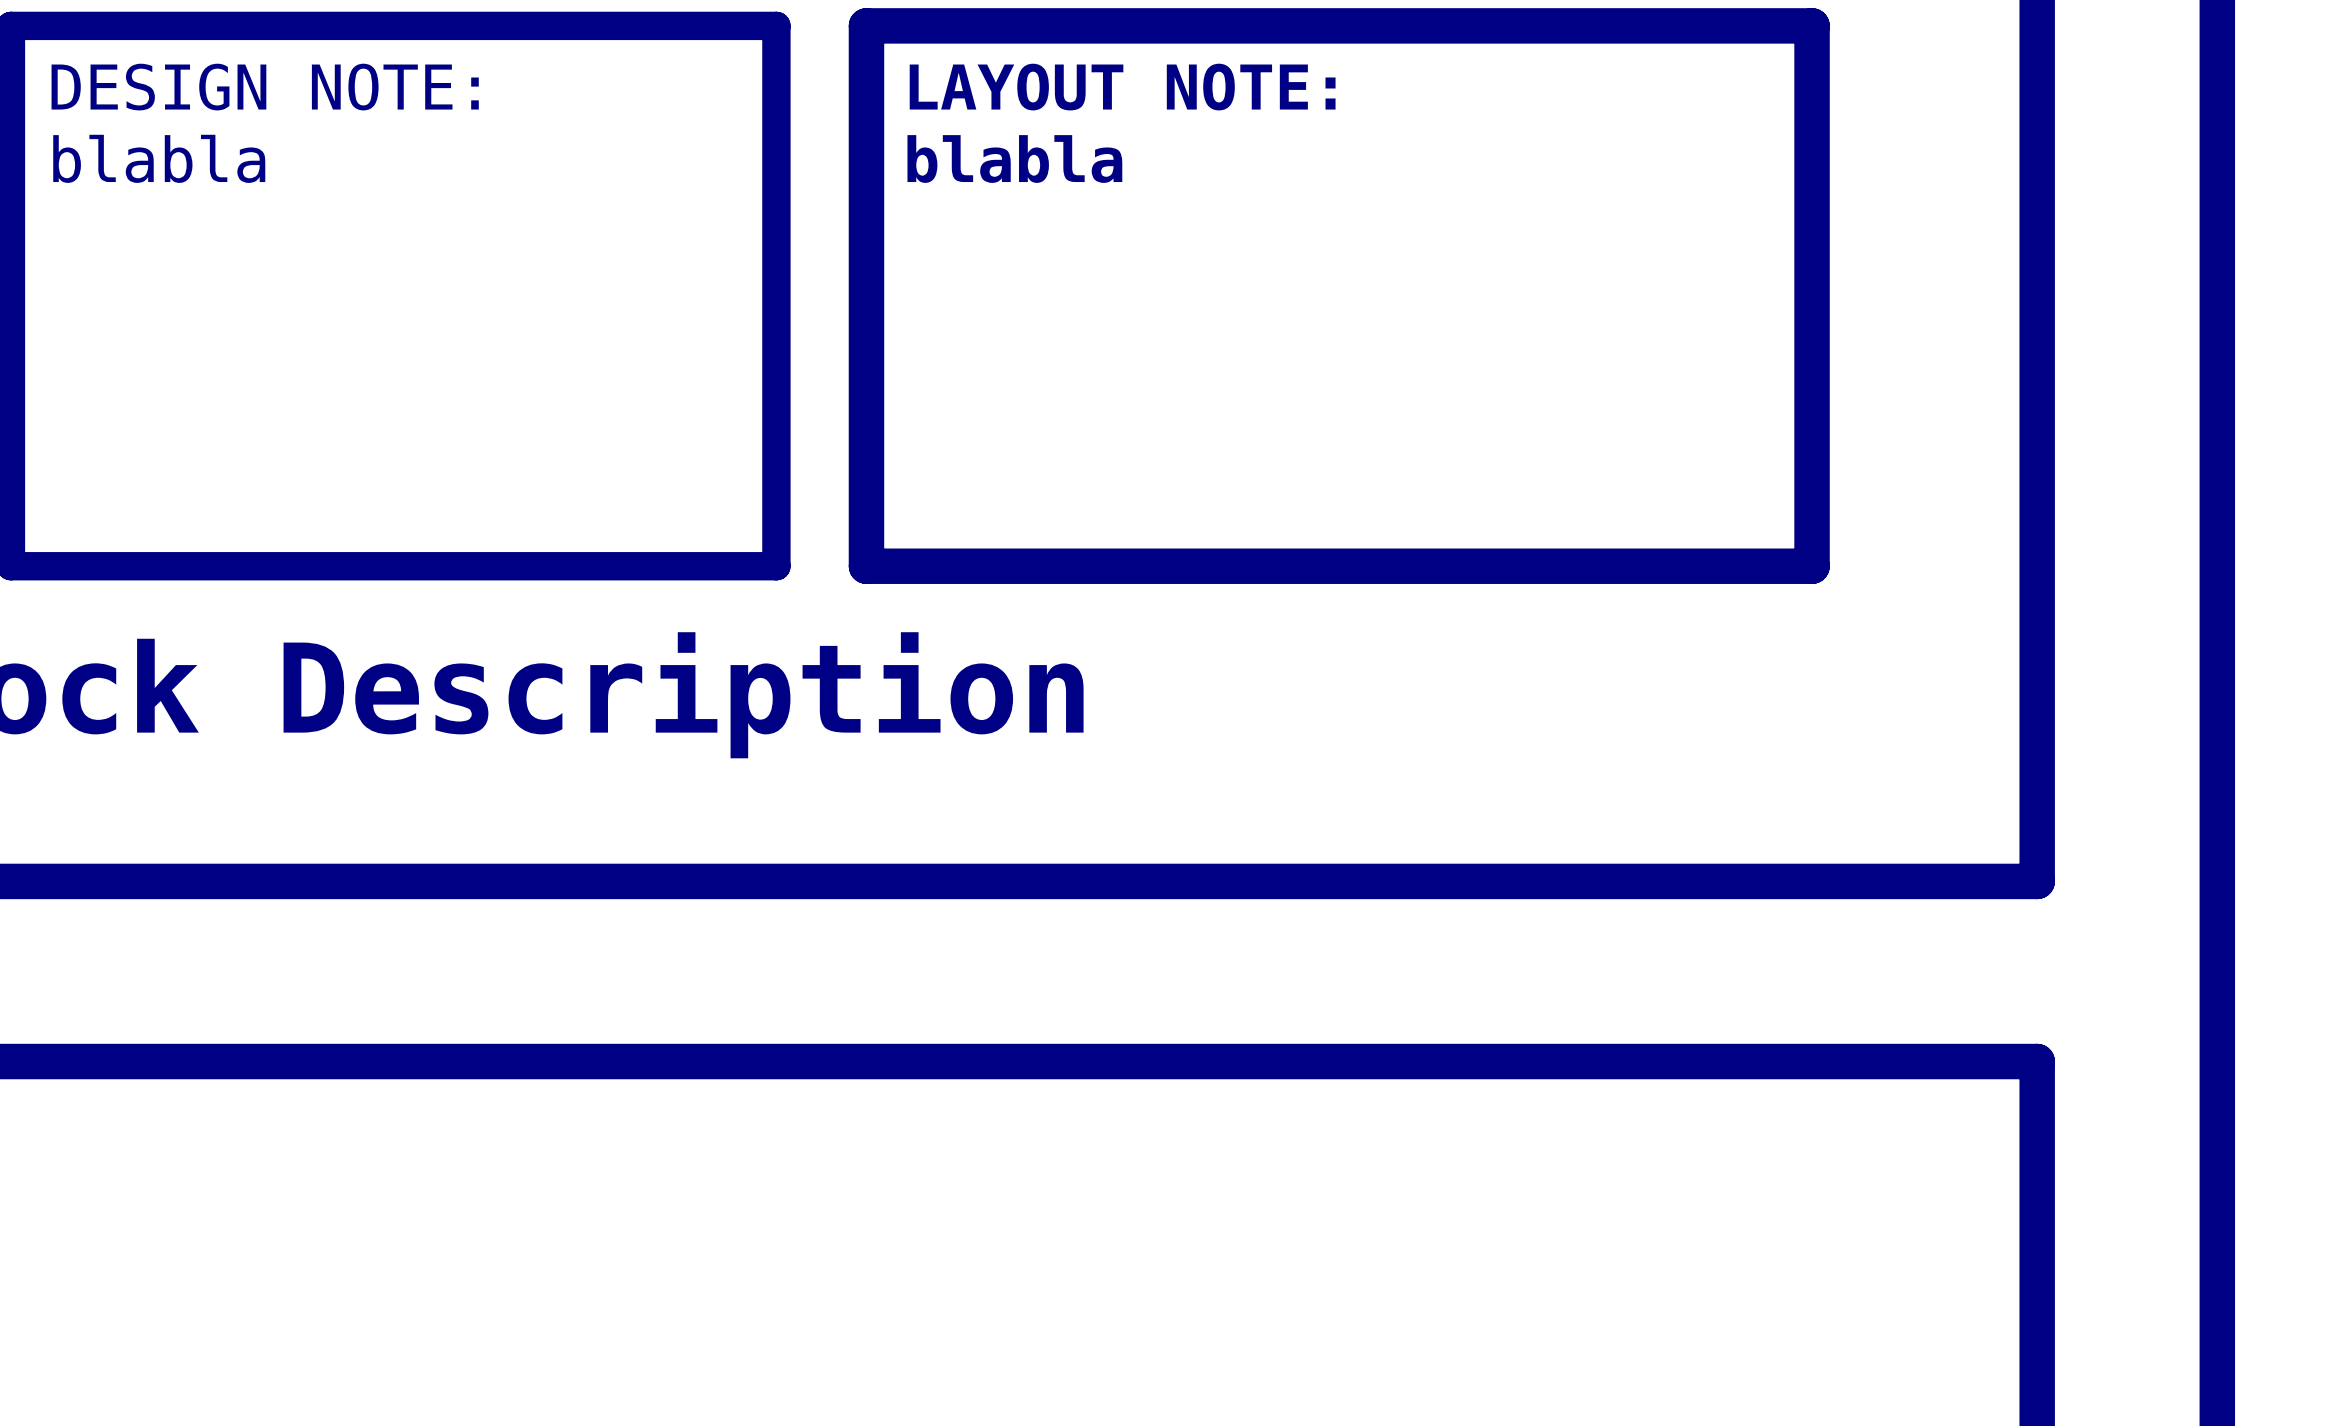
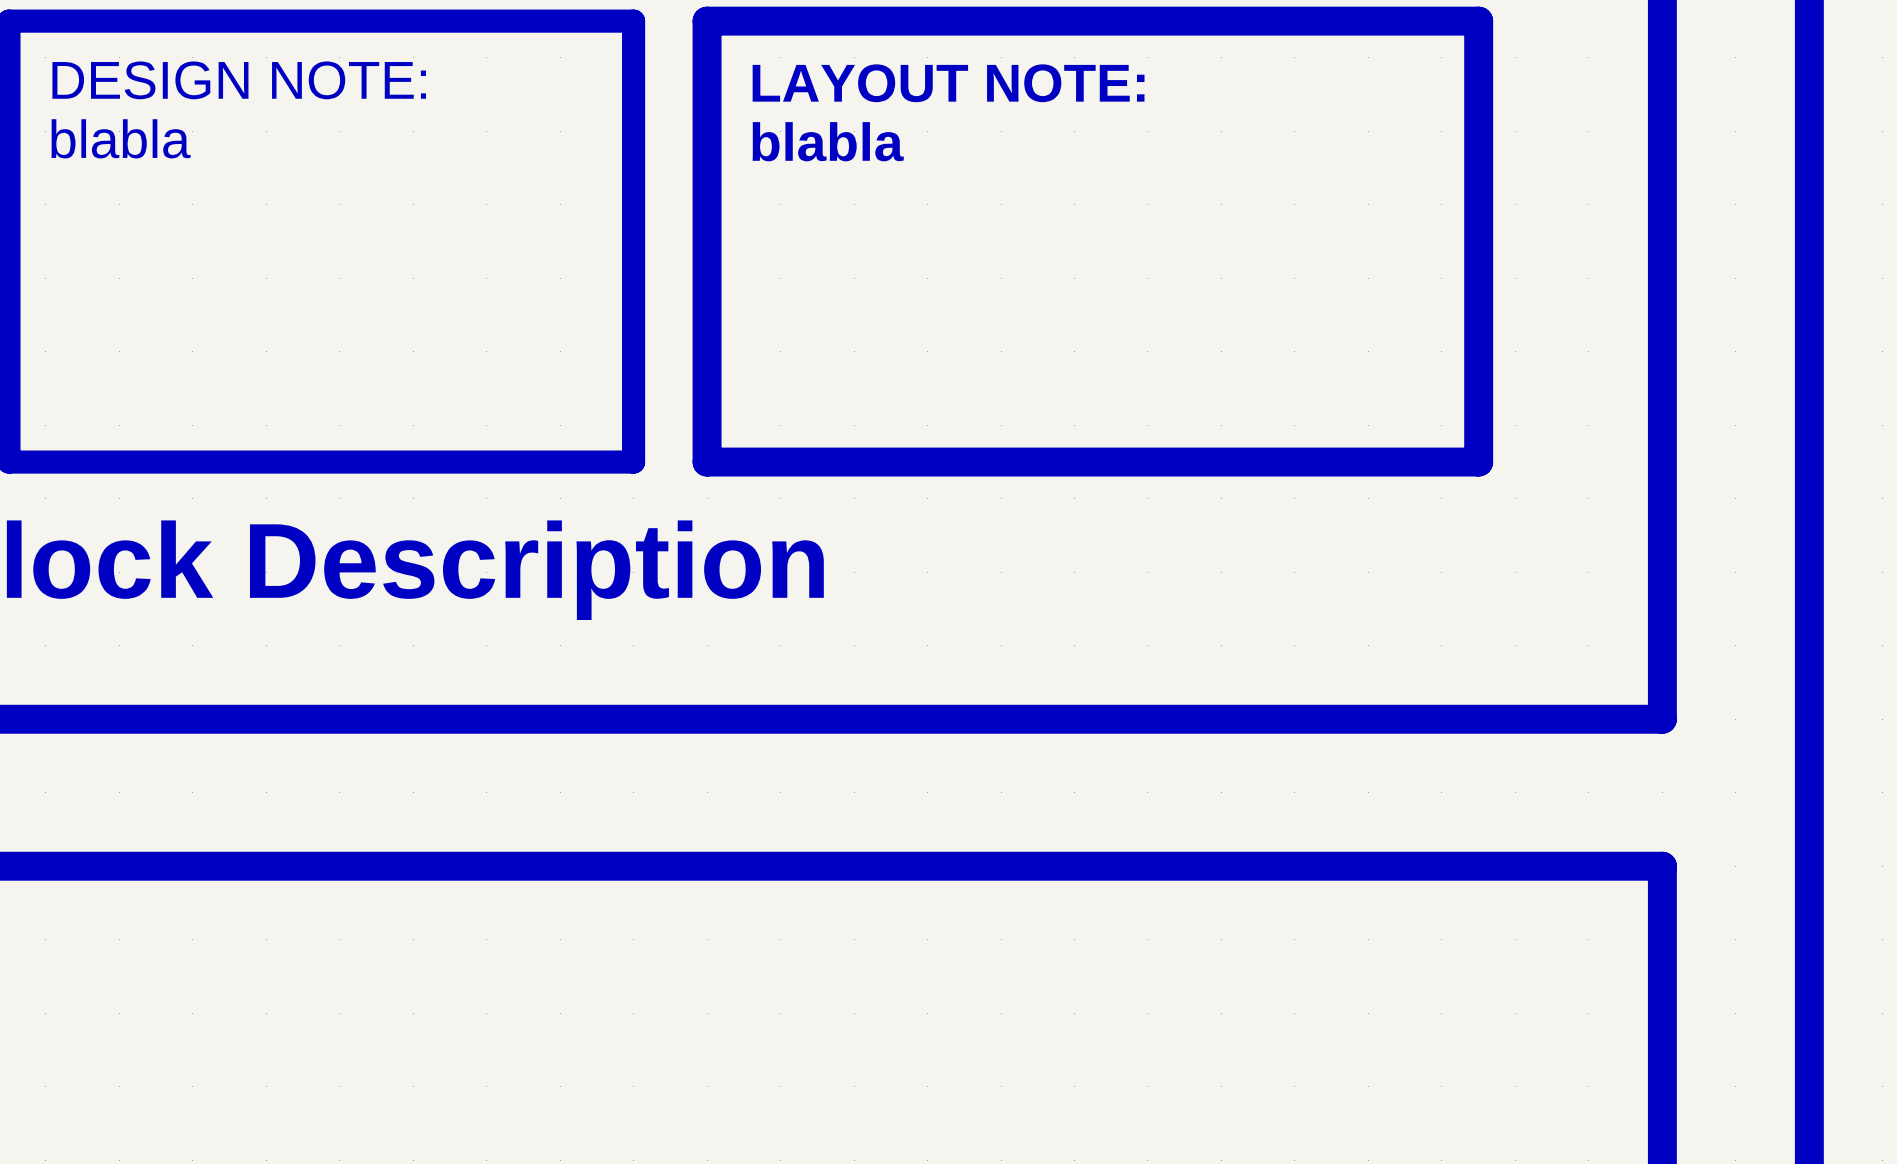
text position: DESIGN NOTE: (265, 87) -> DESIGN NOTE: (239, 80)
text position: LAYOUT NOTE: (1122, 87) -> LAYOUT NOTE: (948, 83)
text position: blabla (159, 158) -> blabla (121, 138)
text position: blabla (1014, 159) -> blabla (828, 141)

